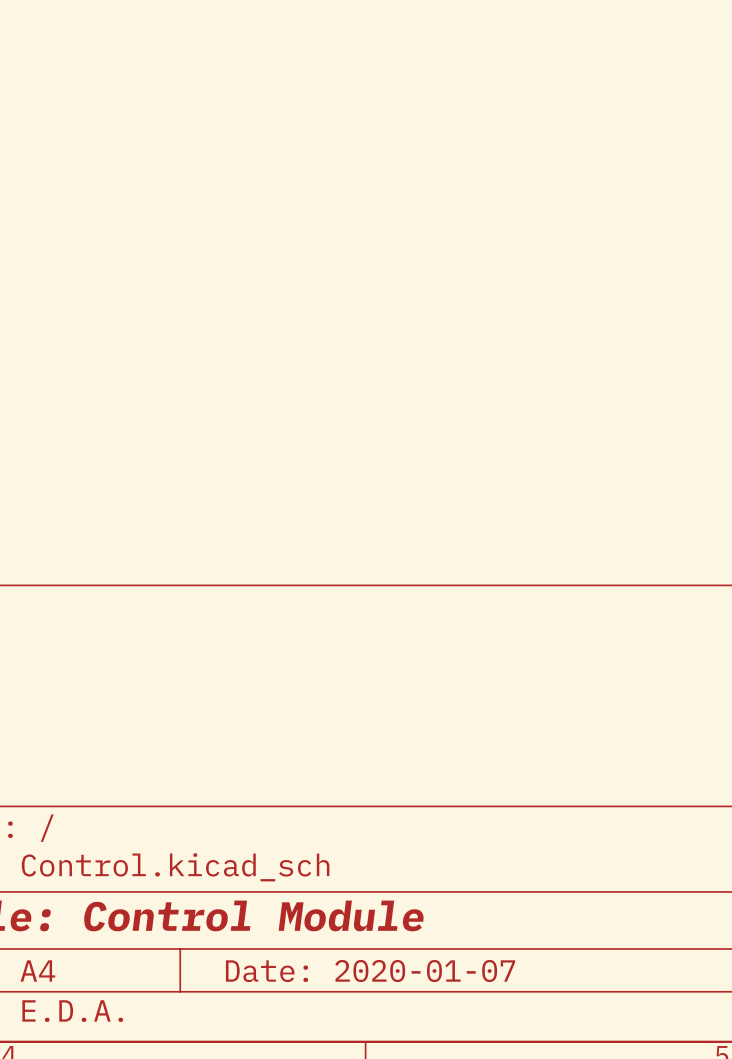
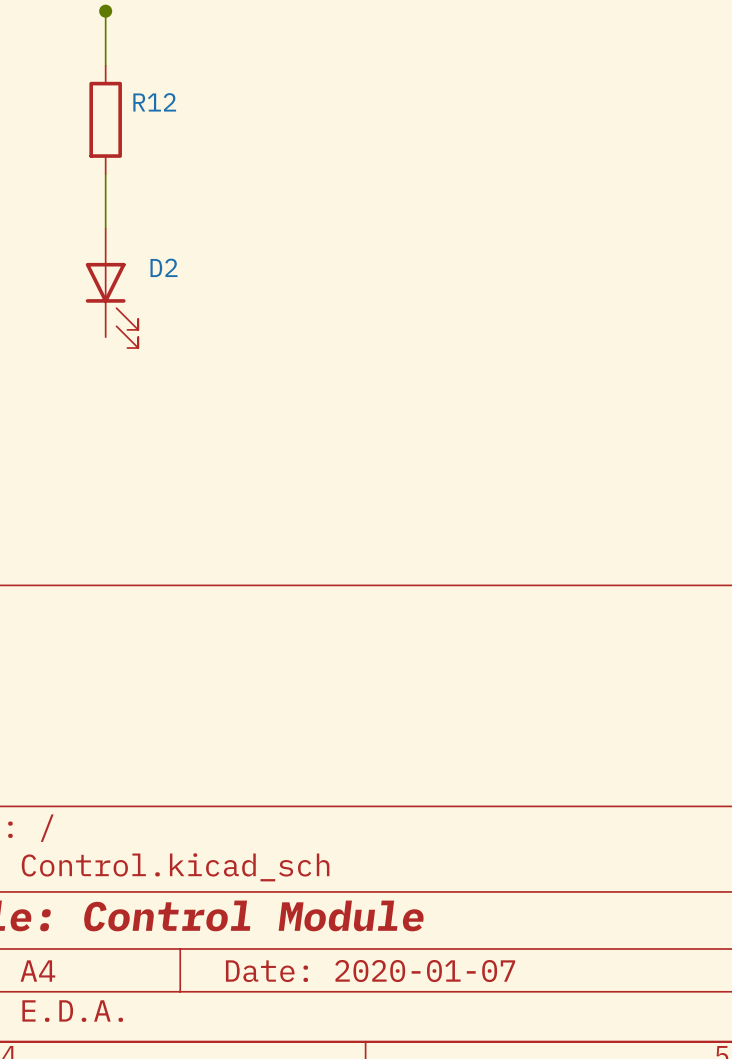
wire: none -> (105, 11) (105, 65)
junction: none -> (105, 11)
R12: none -> (105, 119)
wire: none -> (105, 174) (105, 228)
D2: none -> (112, 288)

